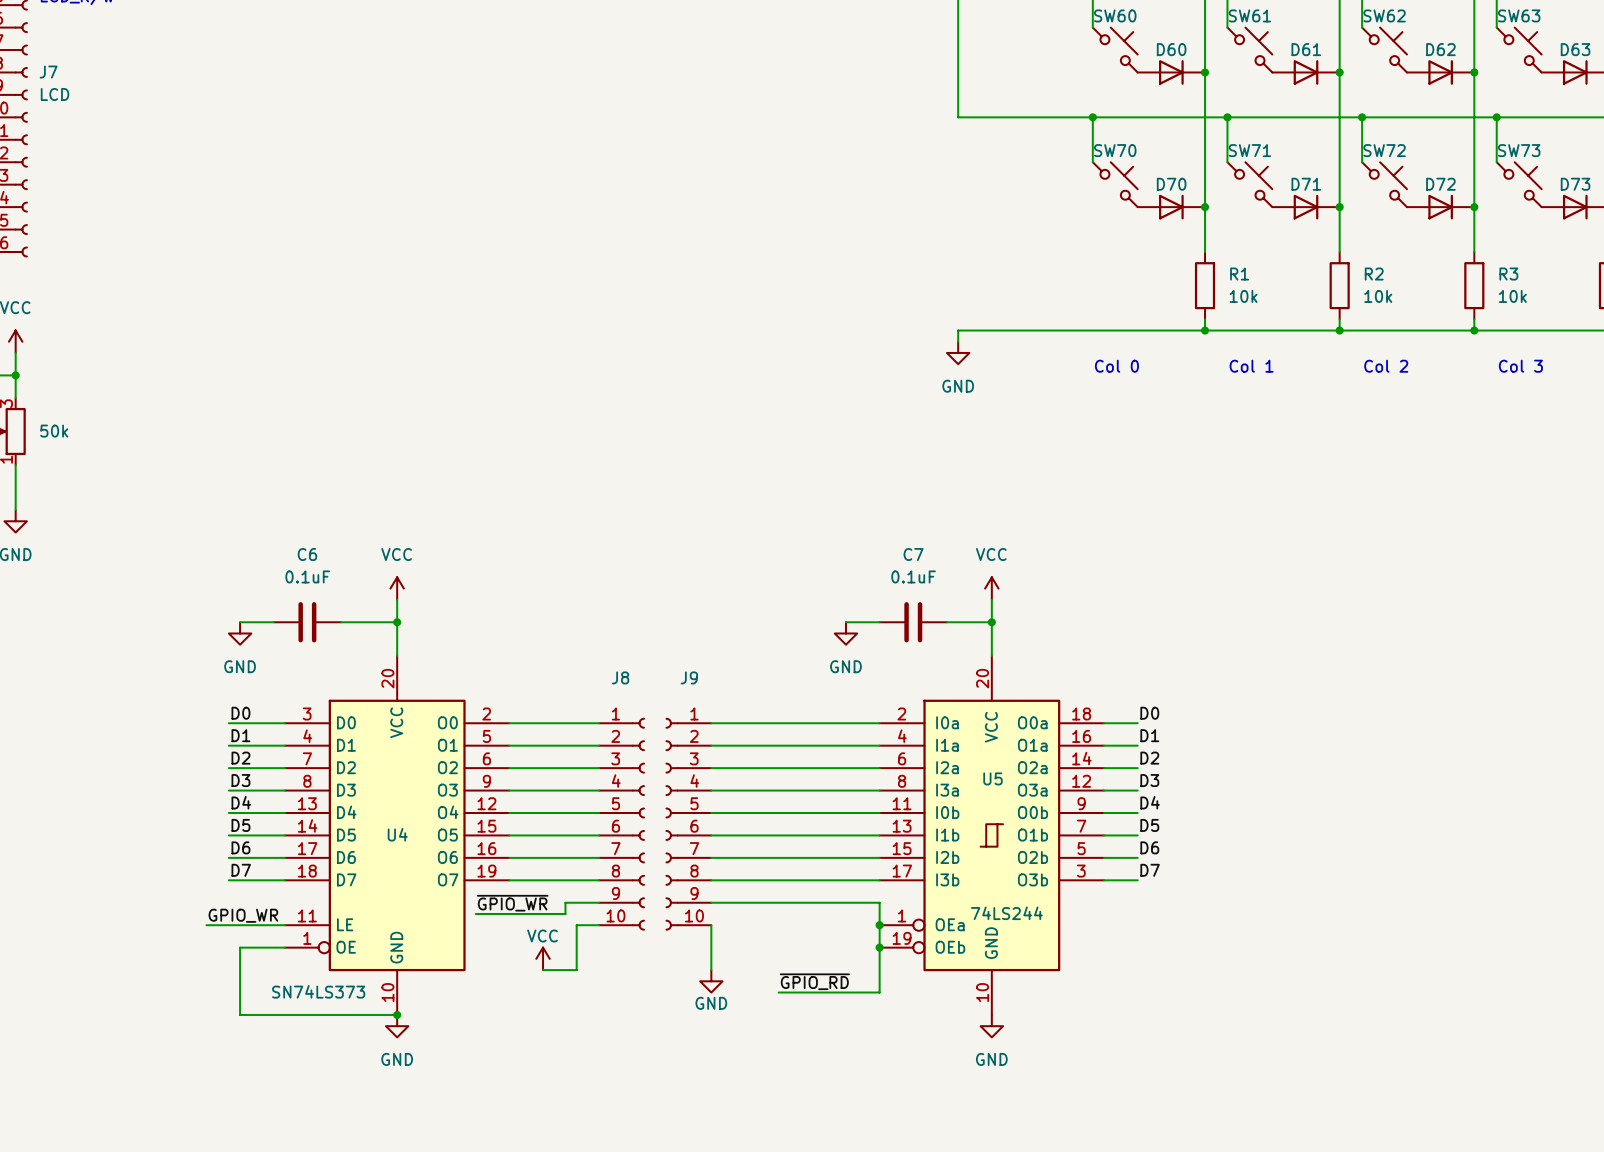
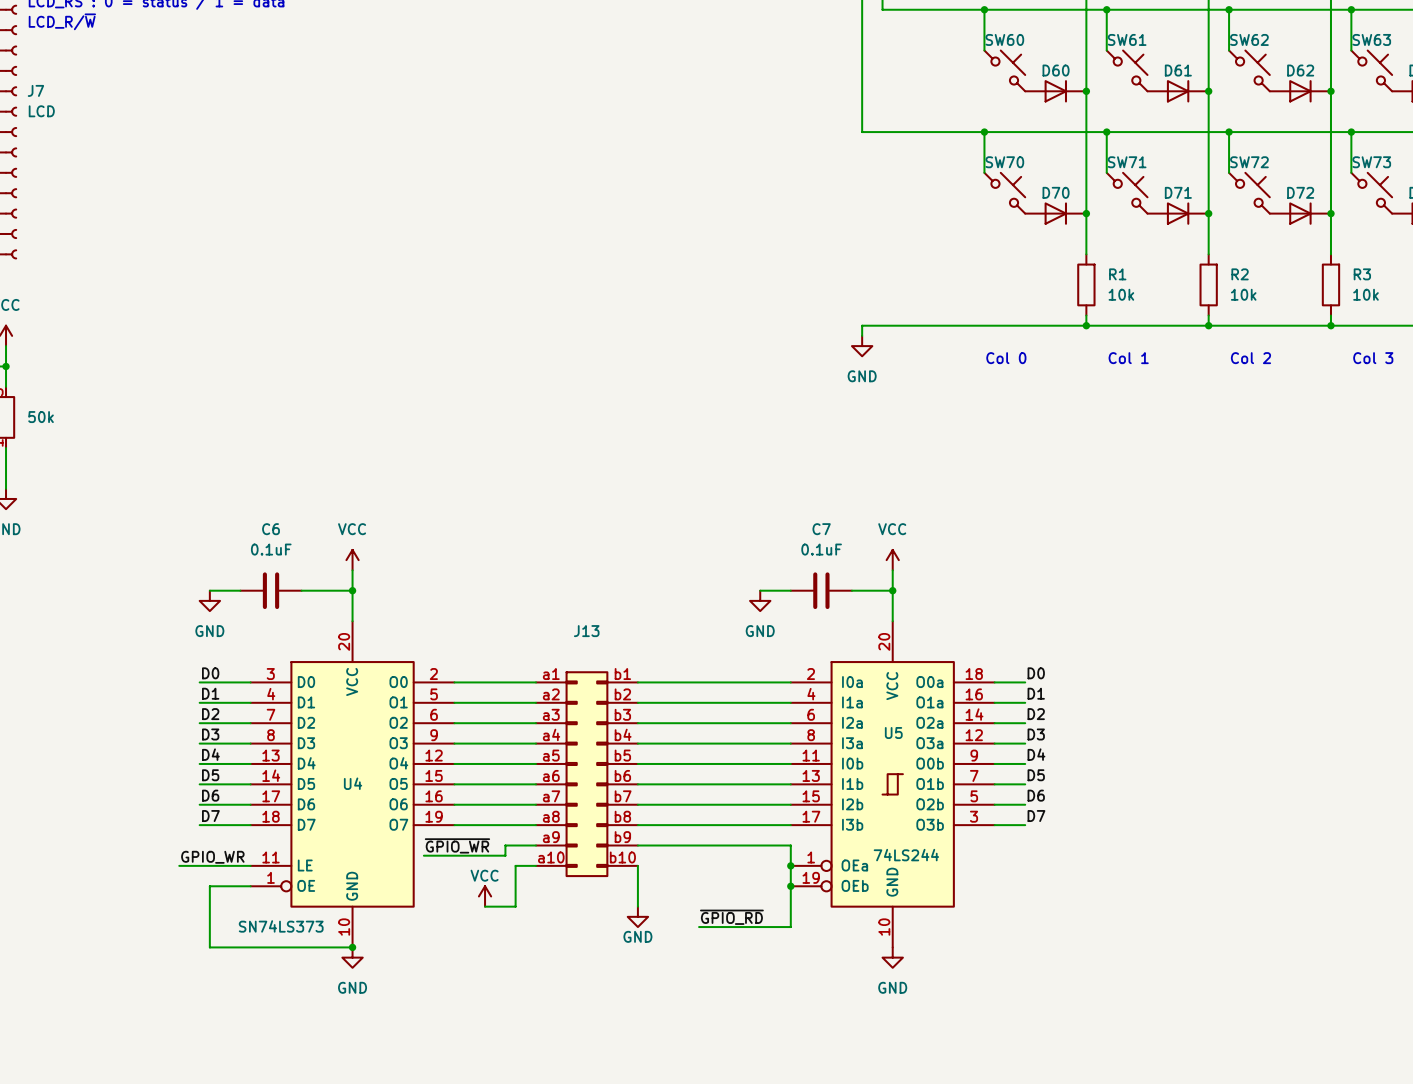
J8: (621, 824) -> none
J13: none -> (586, 774)
J9: (688, 824) -> none

